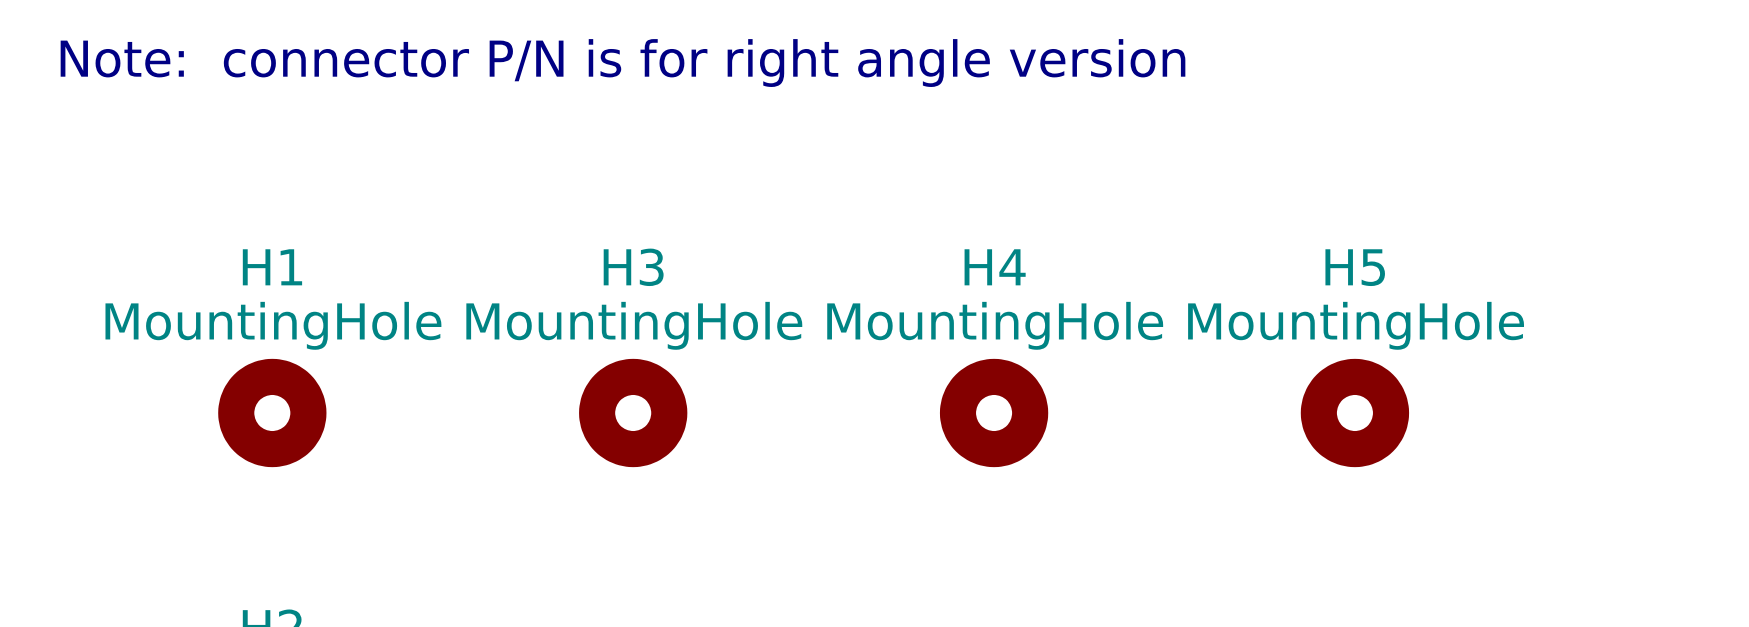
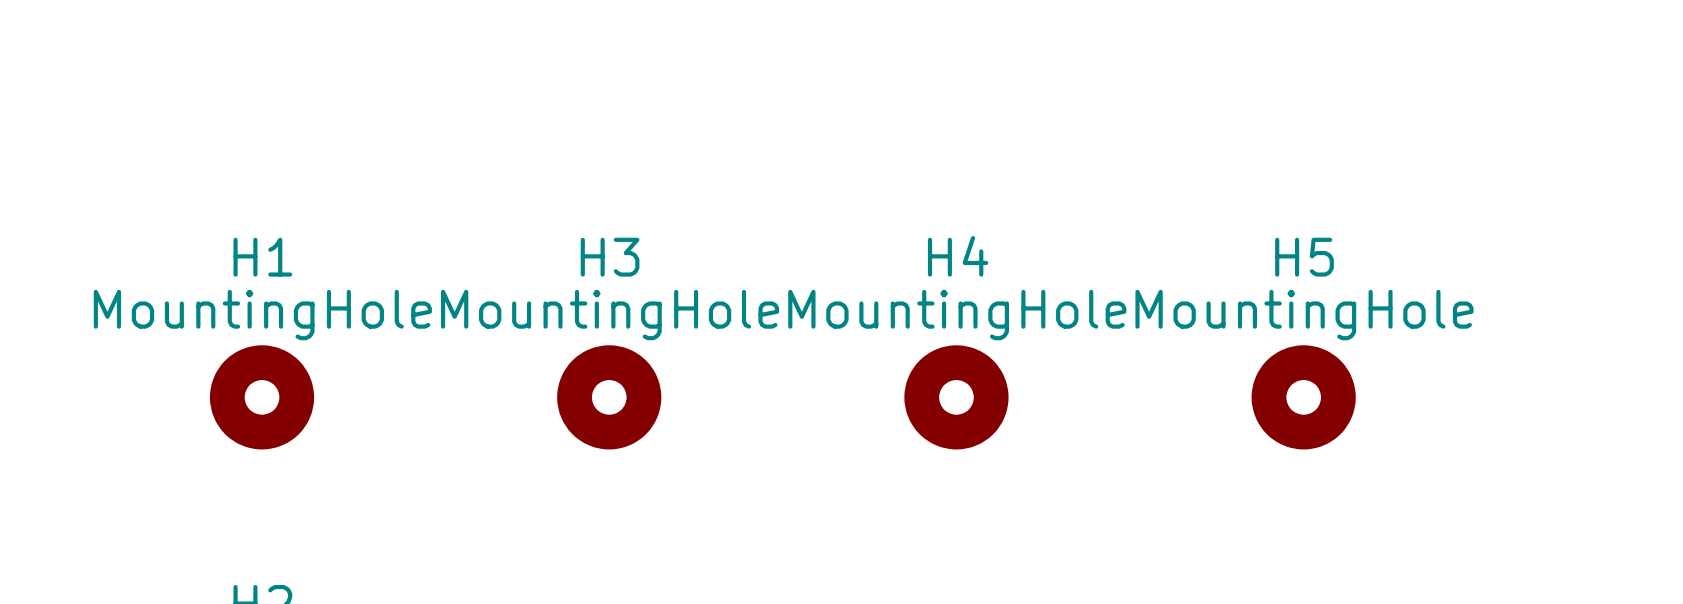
text: Note: connector P/N is for right angle version (623, 63) -> none

